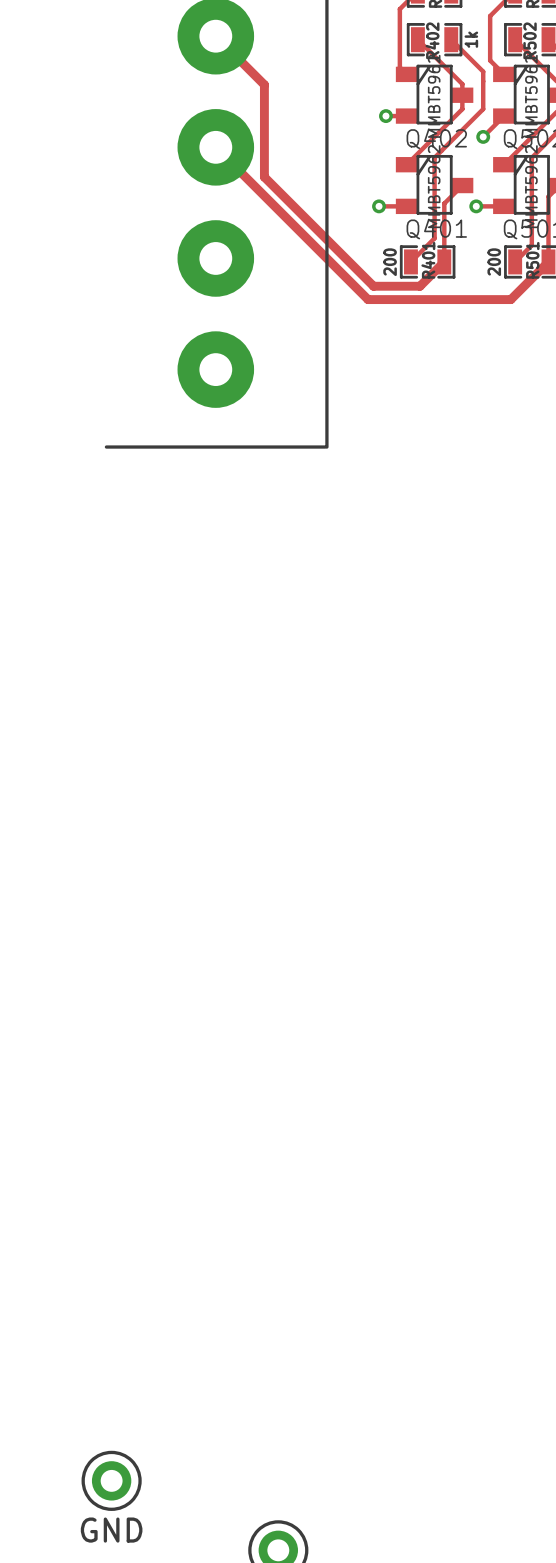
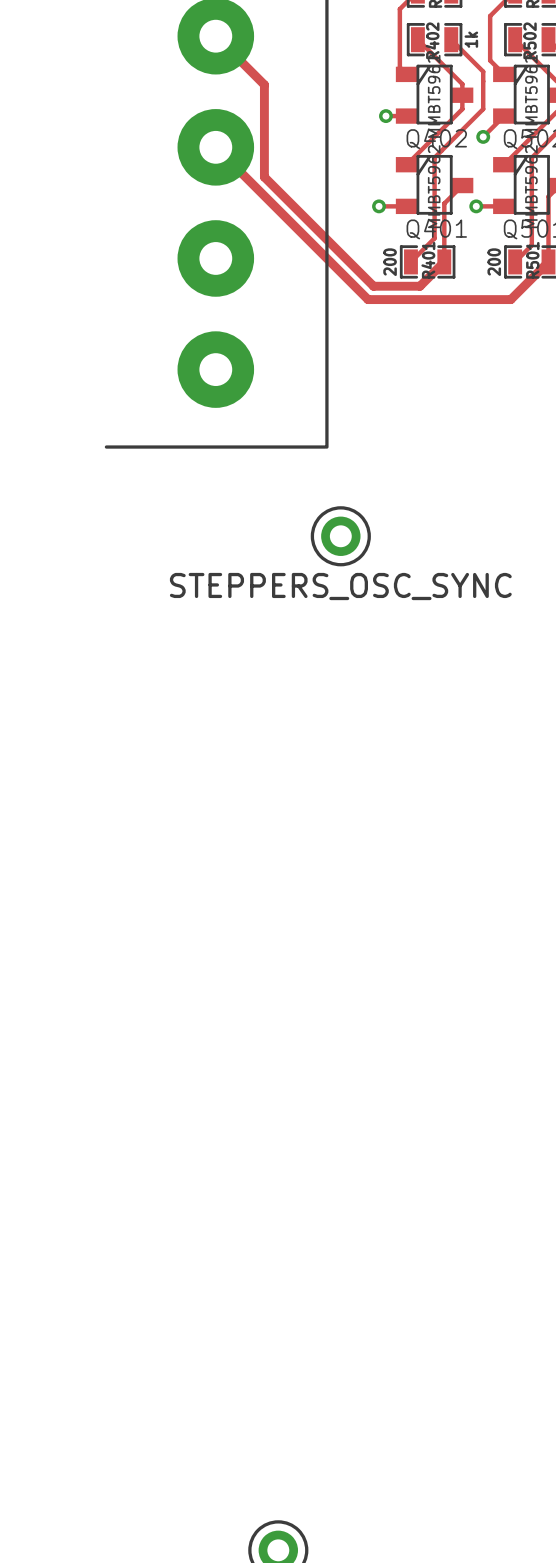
part: none -> STEPPERS_OSC_SYNC (340, 536)
part: GND (111, 1480) -> none

